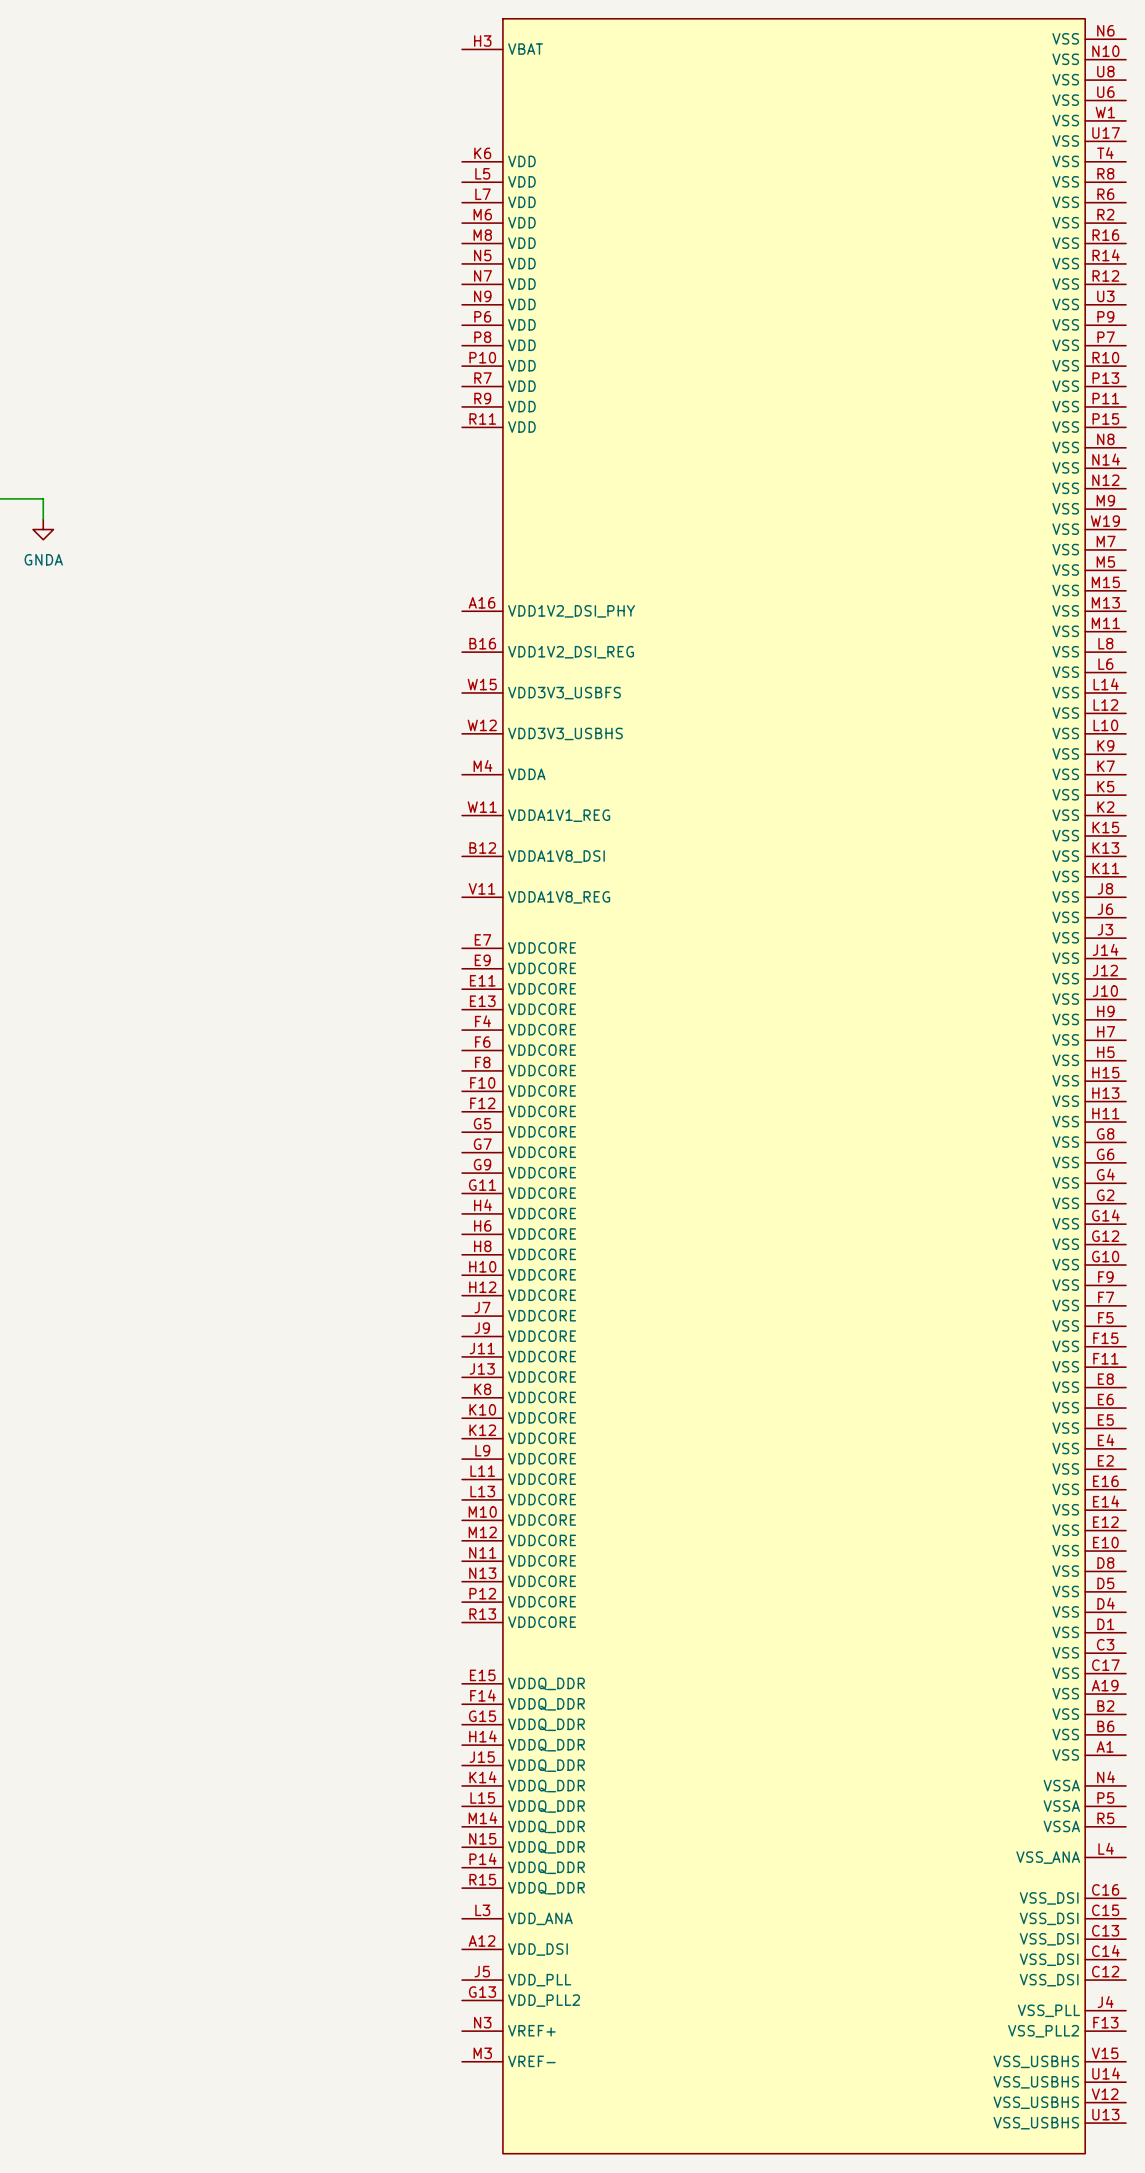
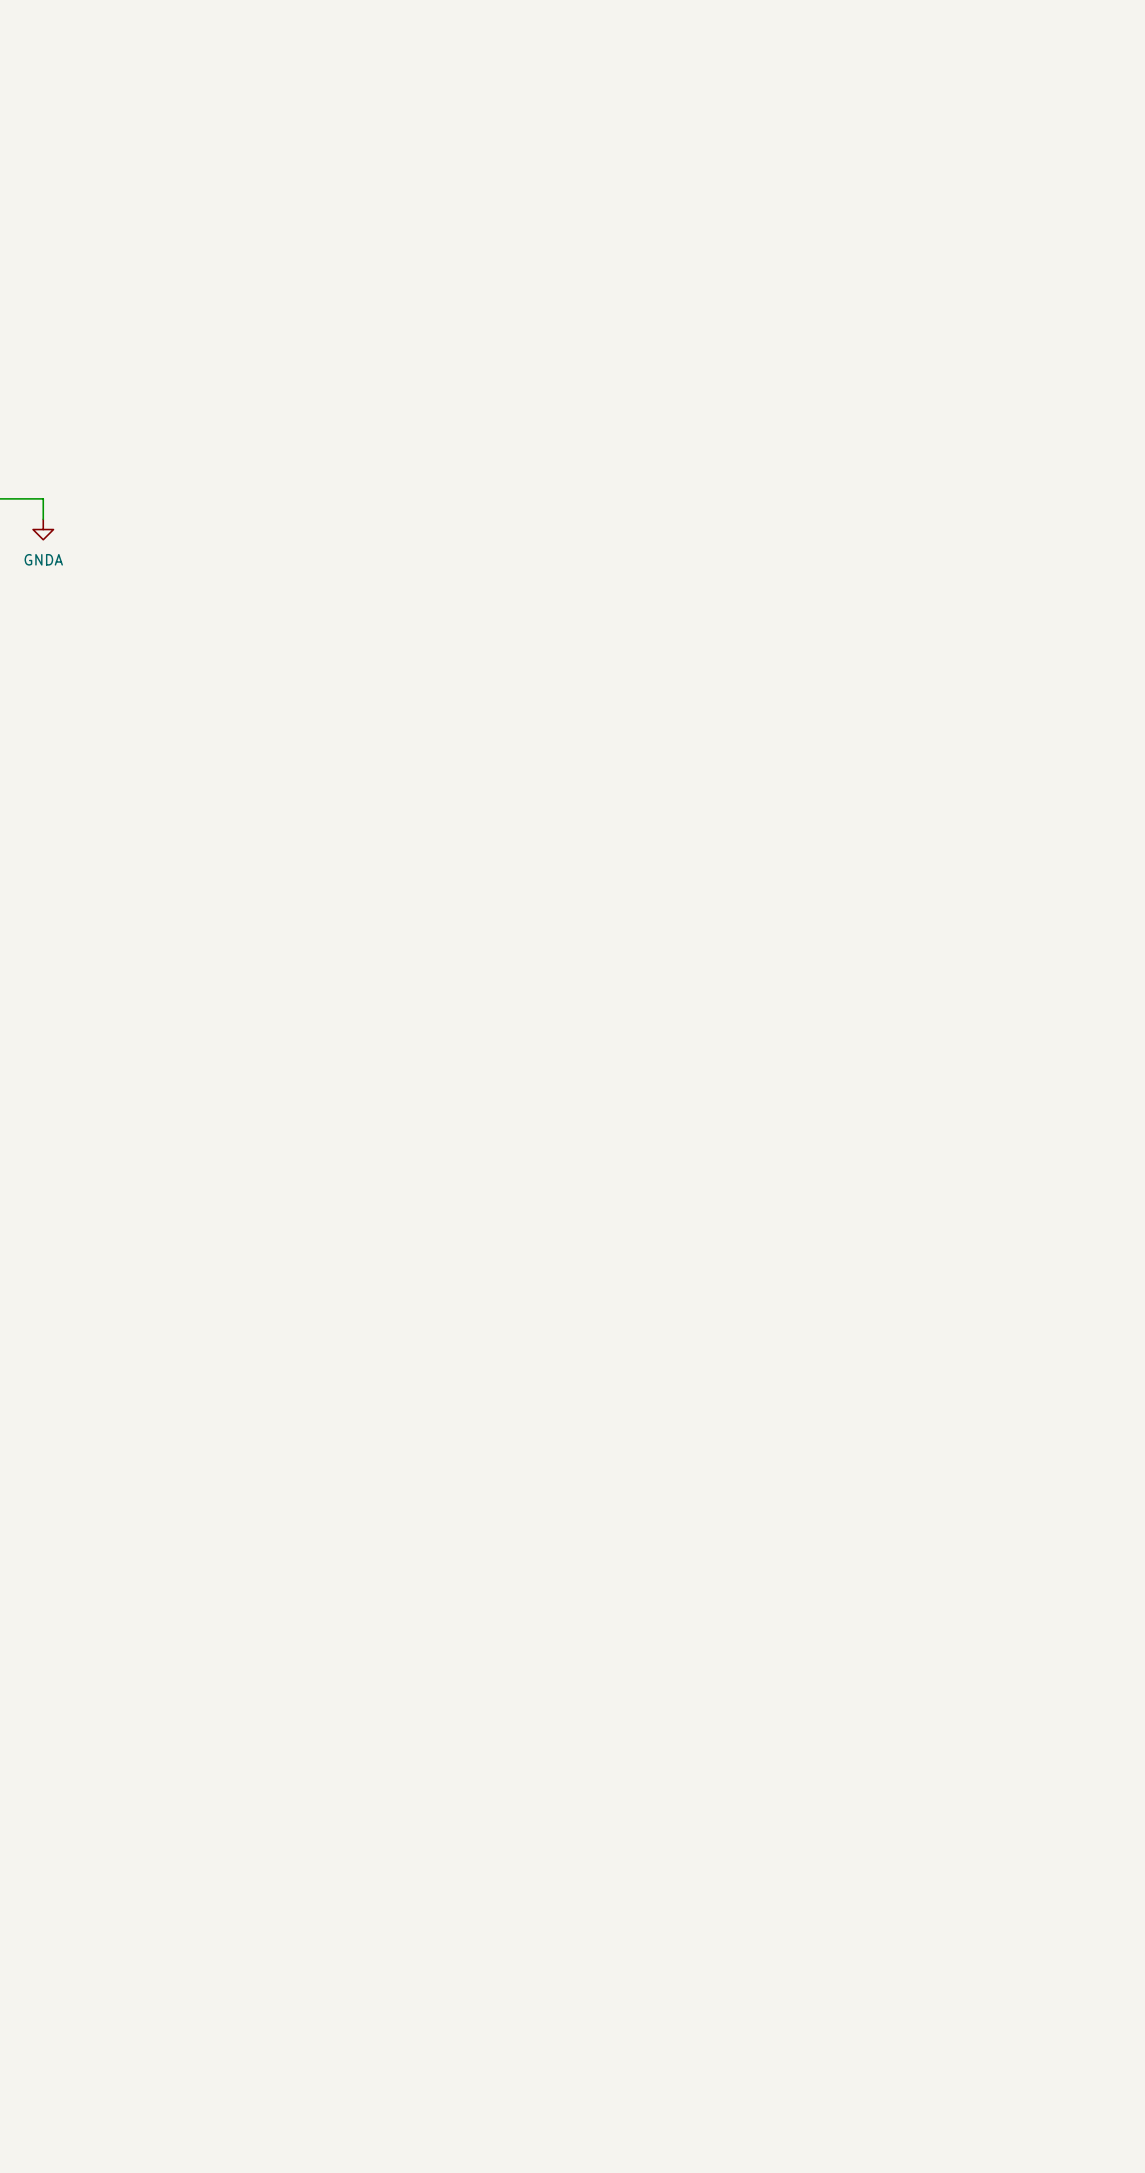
part: (794, 1086) -> none

